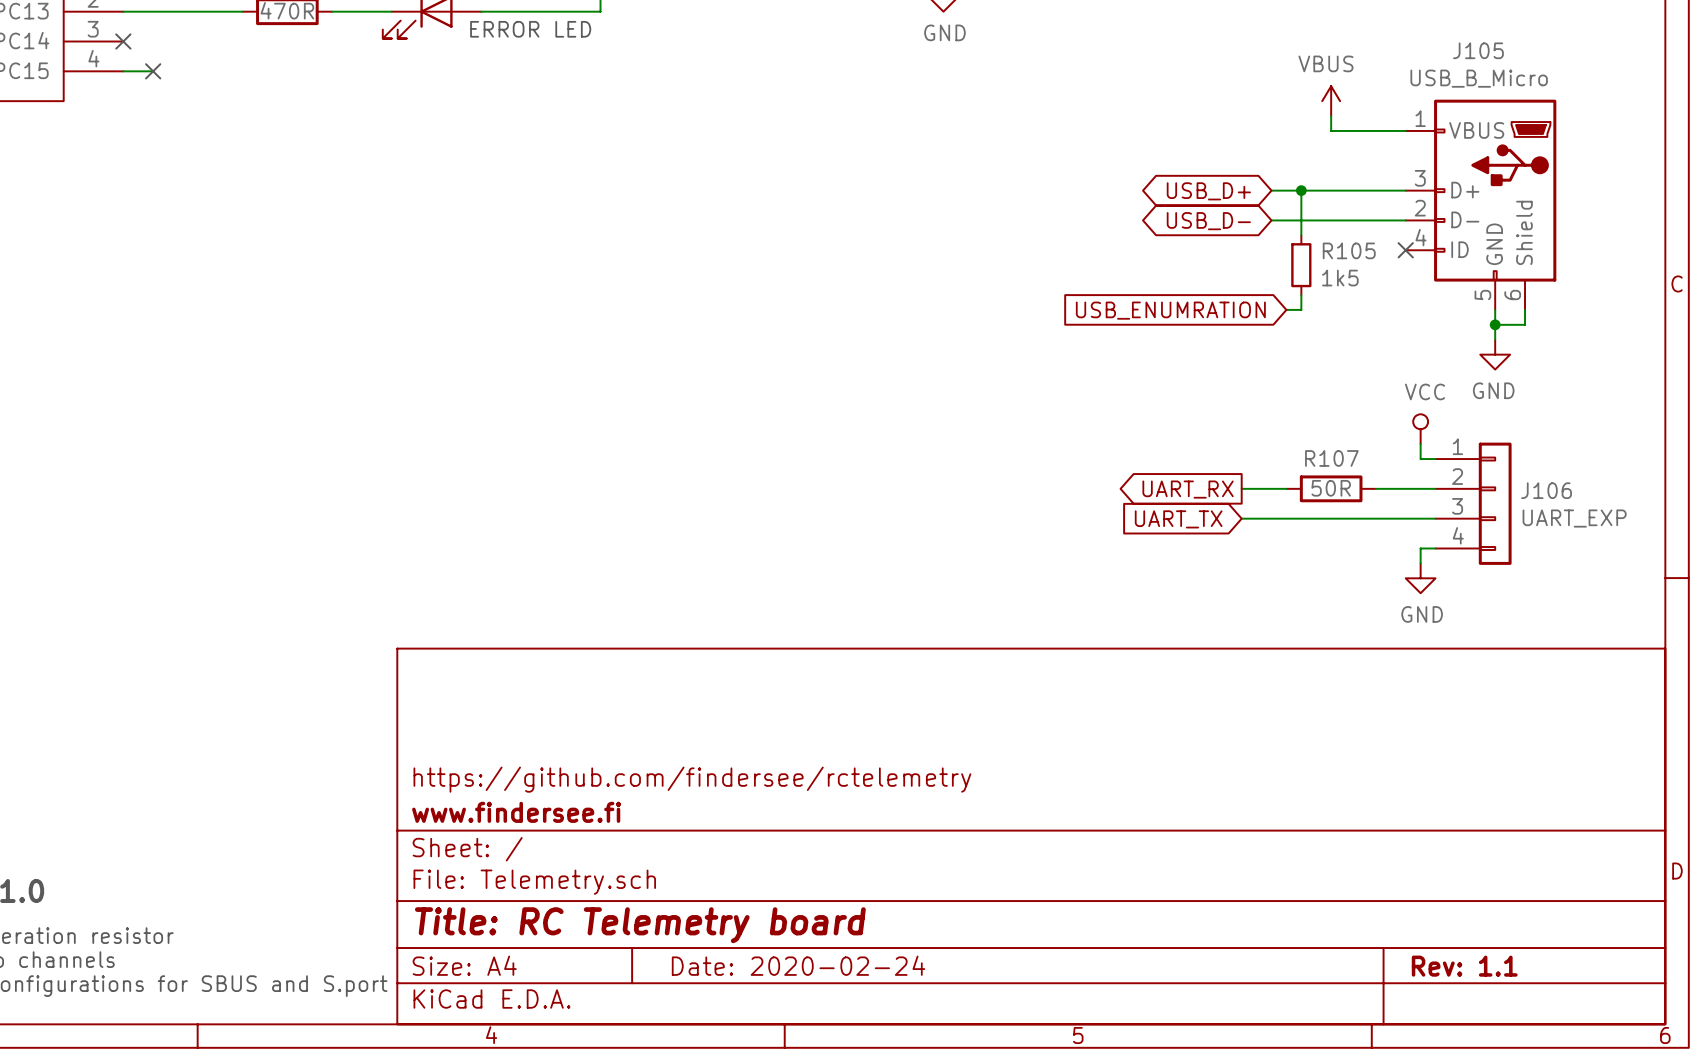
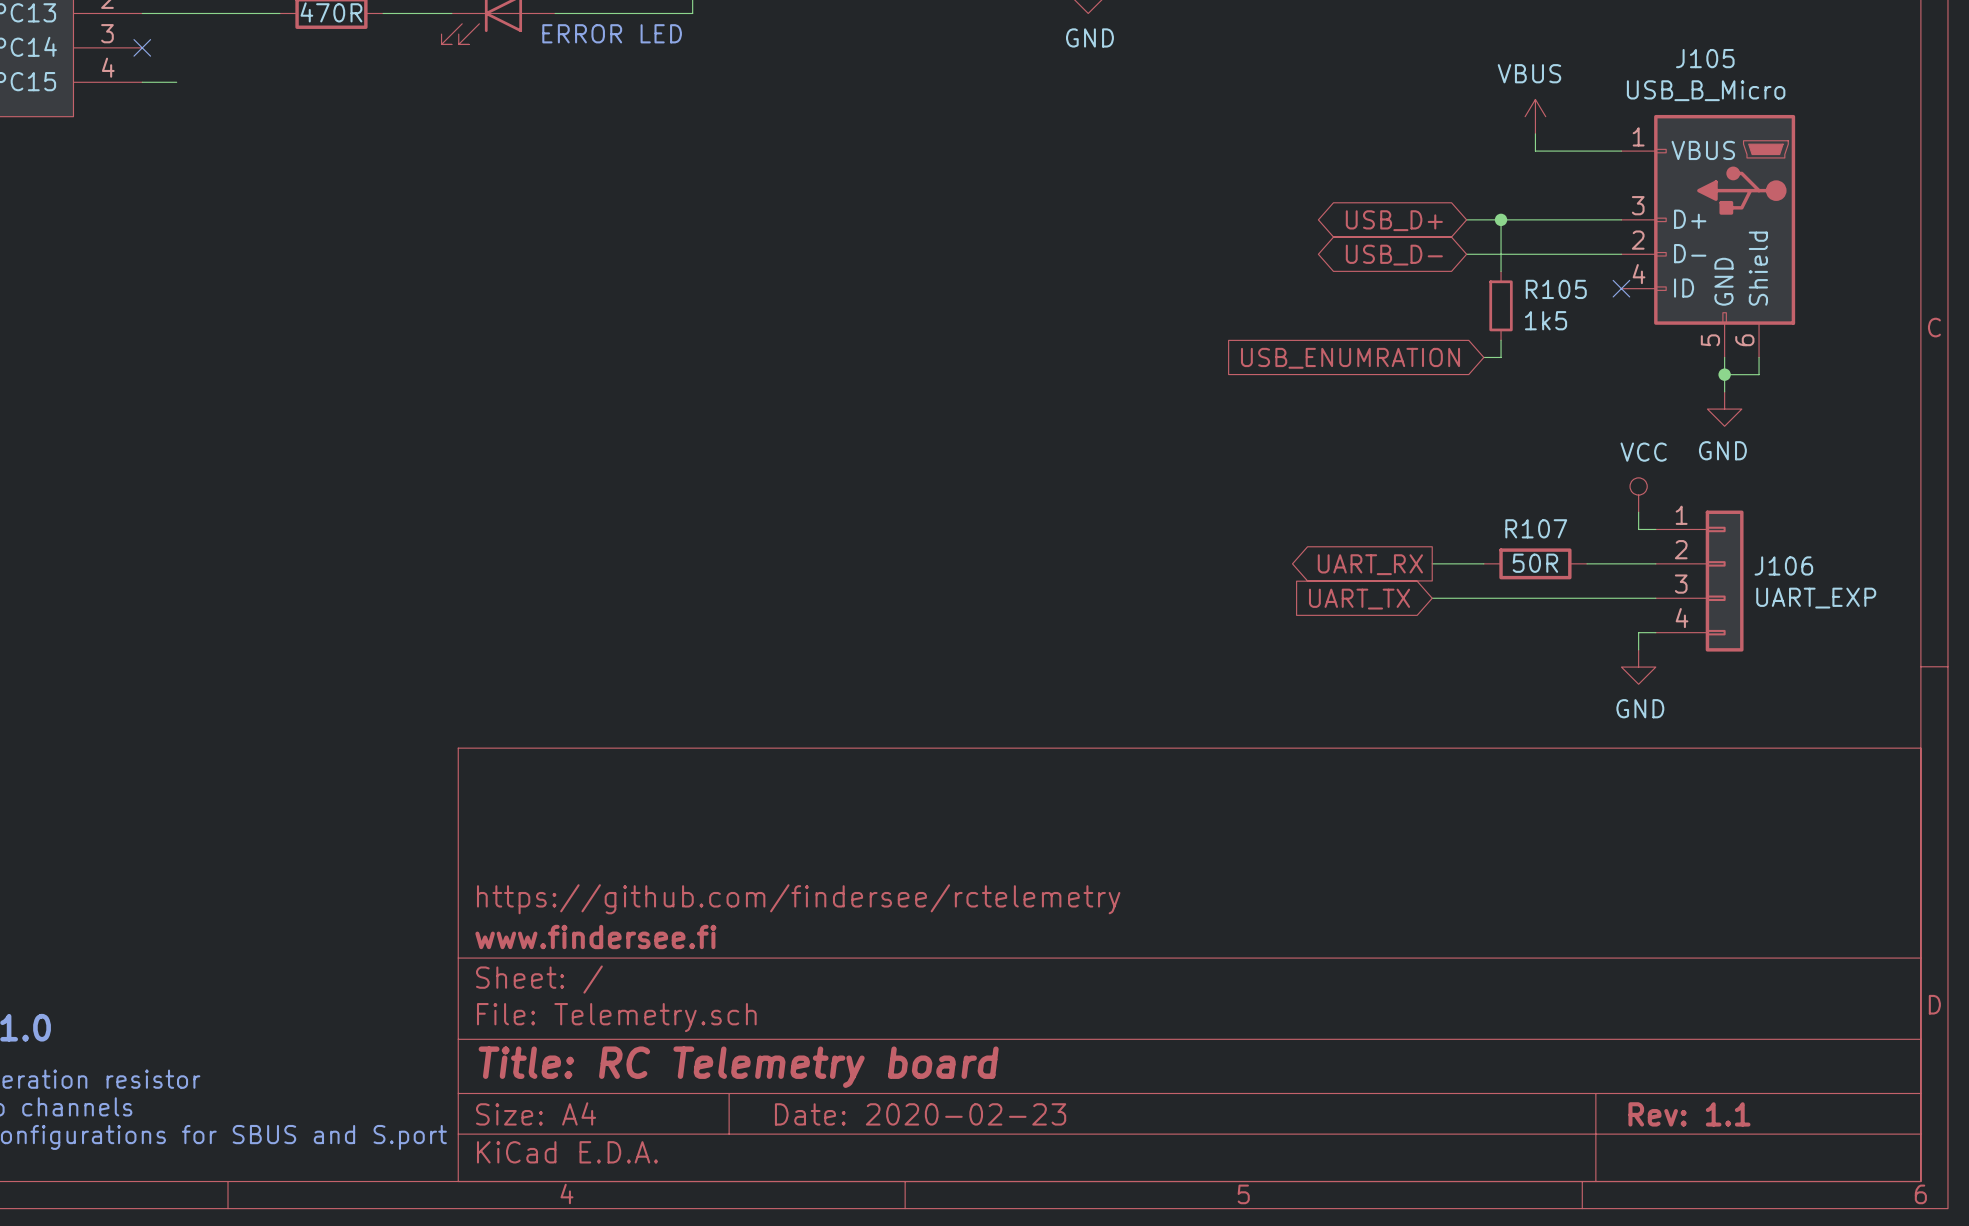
no-connect mark: (153, 71) -> none
title block: Date: 2020-02-24 (798, 965) -> Date: 2020-02-23 (920, 1114)

